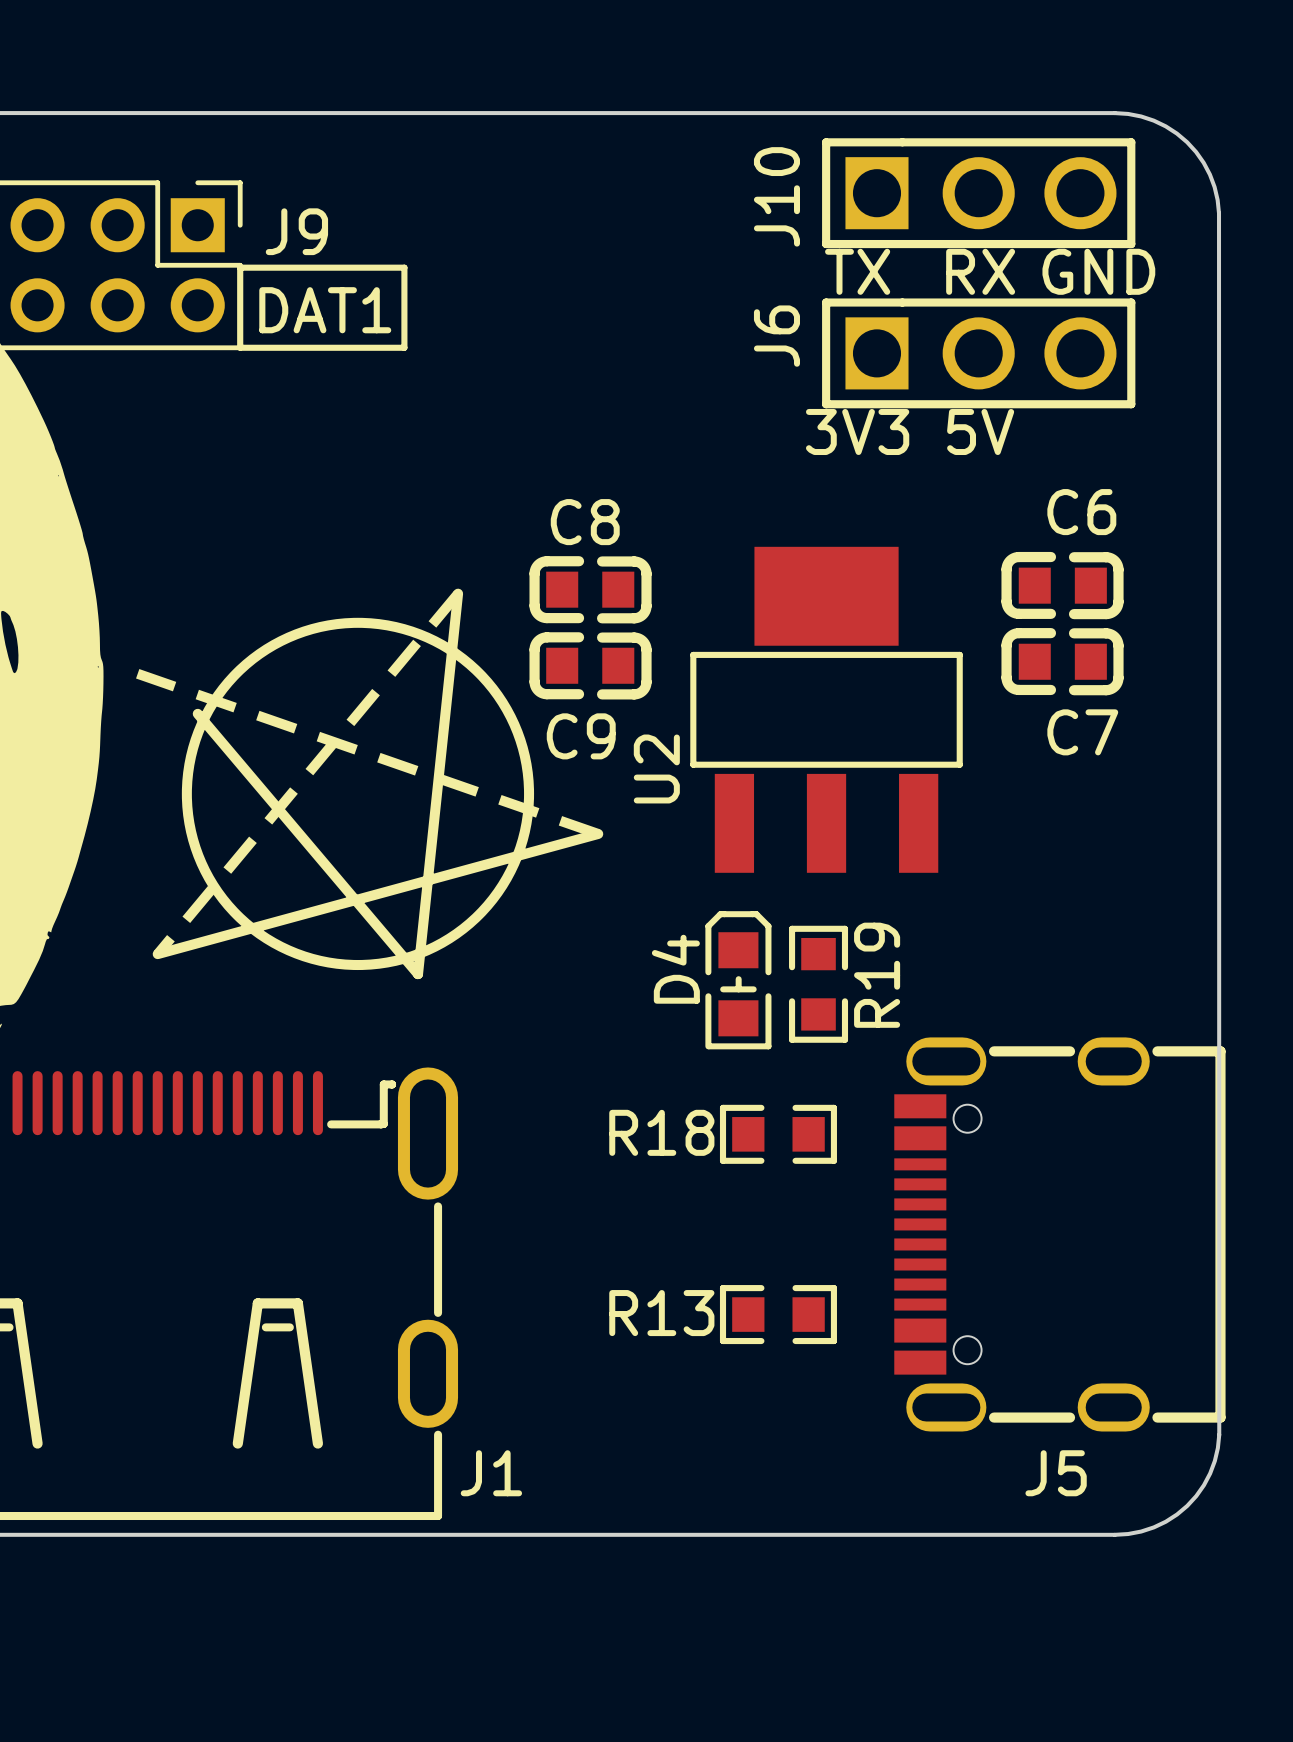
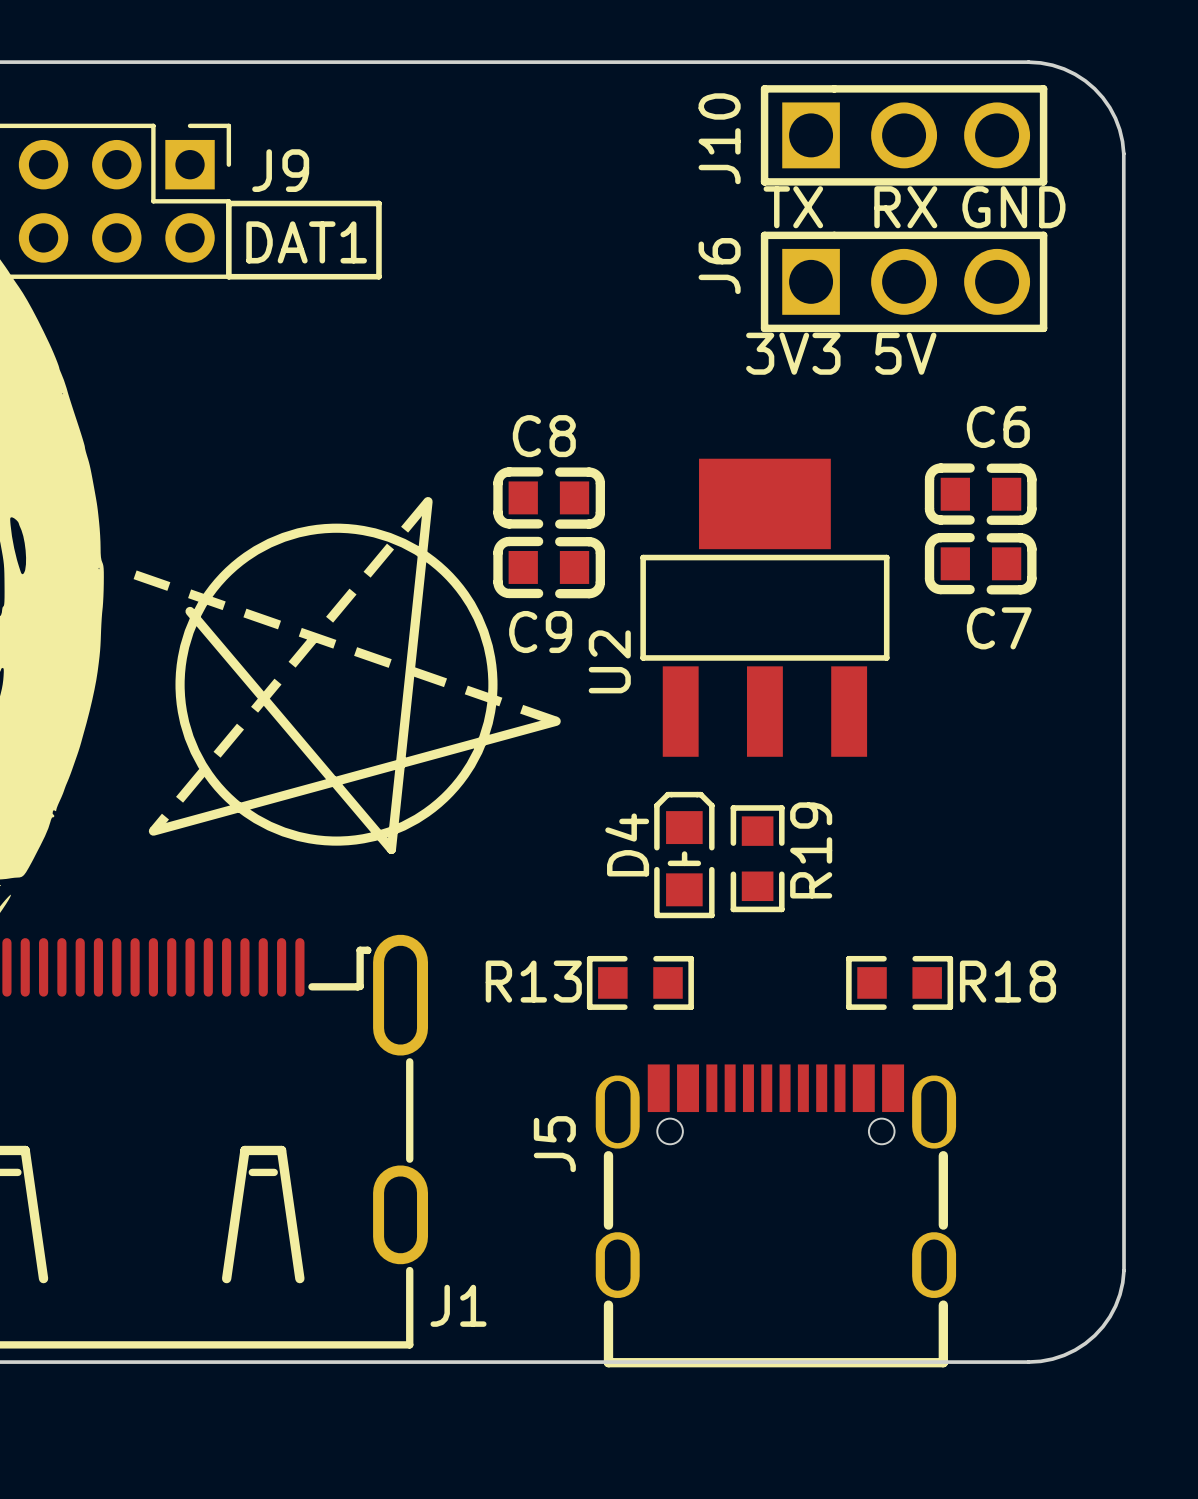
J5 footprint: [894, 1037, 1226, 1432] -> [595, 1064, 957, 1368]
R18 name position: R18 (661, 1132) -> R18 (1007, 981)
R18 position: (778, 1134) -> (899, 982)
R13 position: (778, 1314) -> (640, 982)
J5 name position: J5 (1056, 1473) -> J5 (554, 1144)

